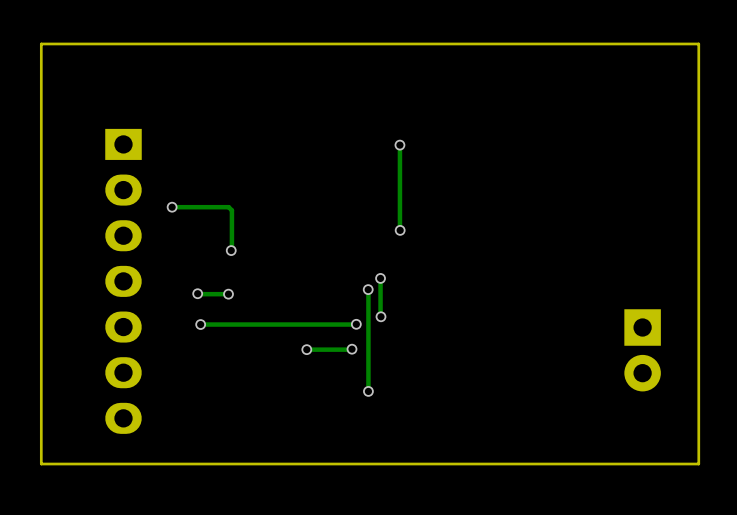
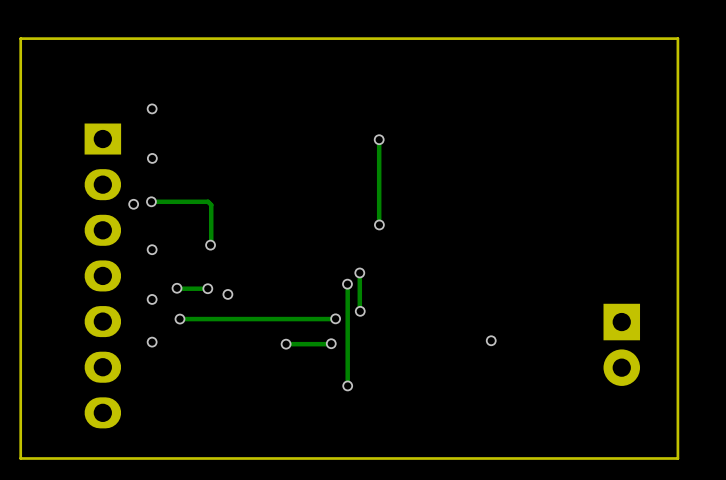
via: none -> (152, 108)
via: none -> (152, 158)
via: none -> (133, 204)
via: none -> (152, 249)
via: none -> (227, 294)
via: none -> (152, 299)
via: none -> (491, 340)
via: none -> (152, 342)

